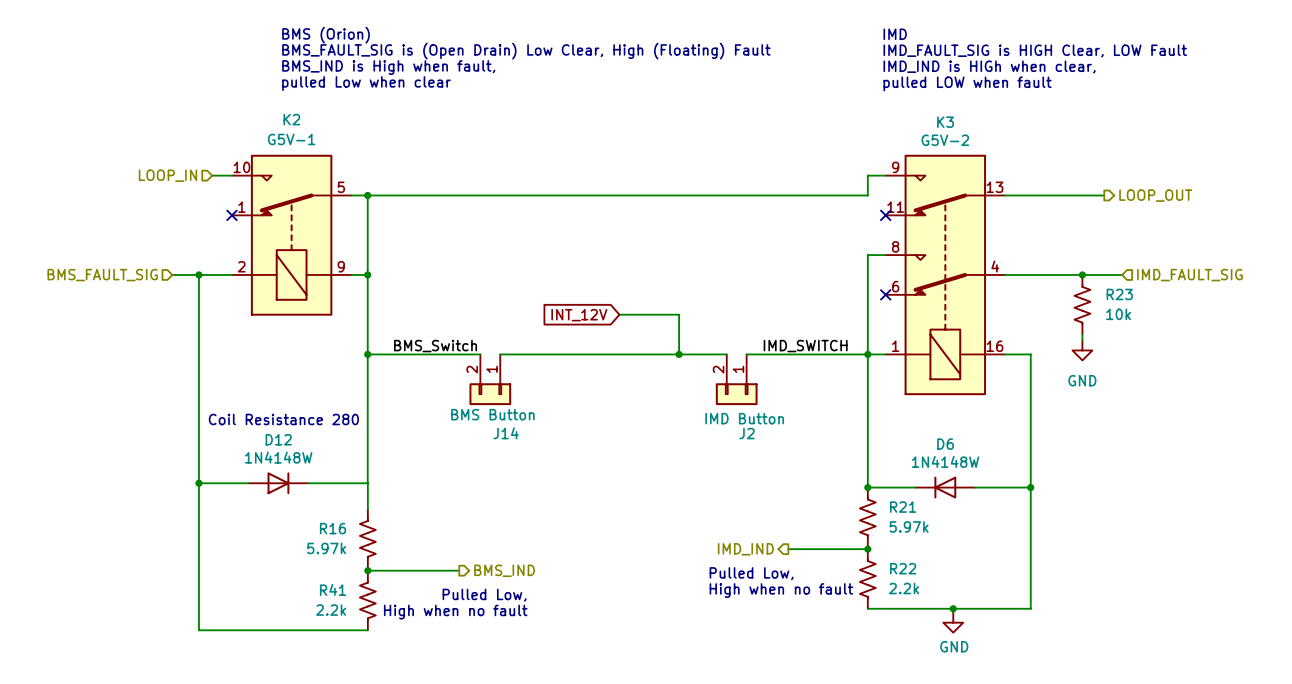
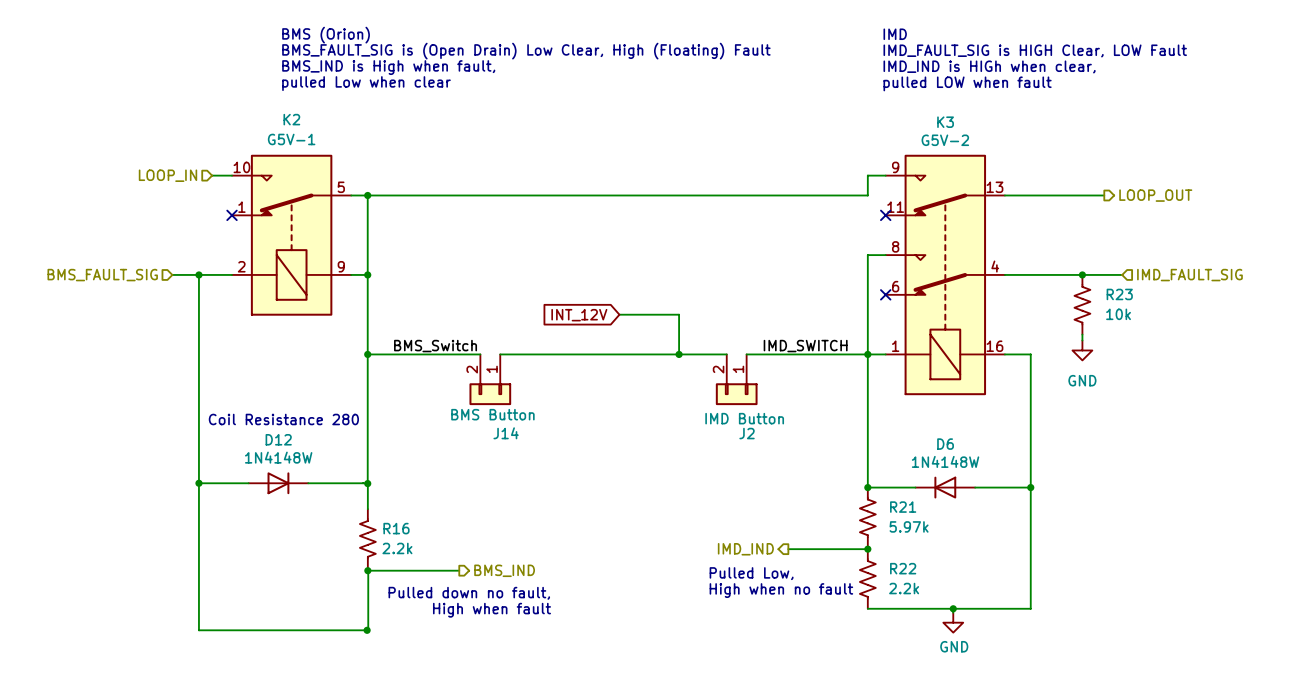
junction: none -> (367, 483)
R16 name position: R16 (333, 528) -> R16 (396, 528)
R16 value: 5.97k (326, 548) -> 2.2k (397, 548)
text: none -> Pulled down no fault, (469, 593)
text: Pulled Low, (484, 595) -> none
R41: 2.2k (367, 600) -> none
text: none -> High when fault (491, 610)
text: High when no fault (455, 612) -> none
junction: none -> (367, 630)

